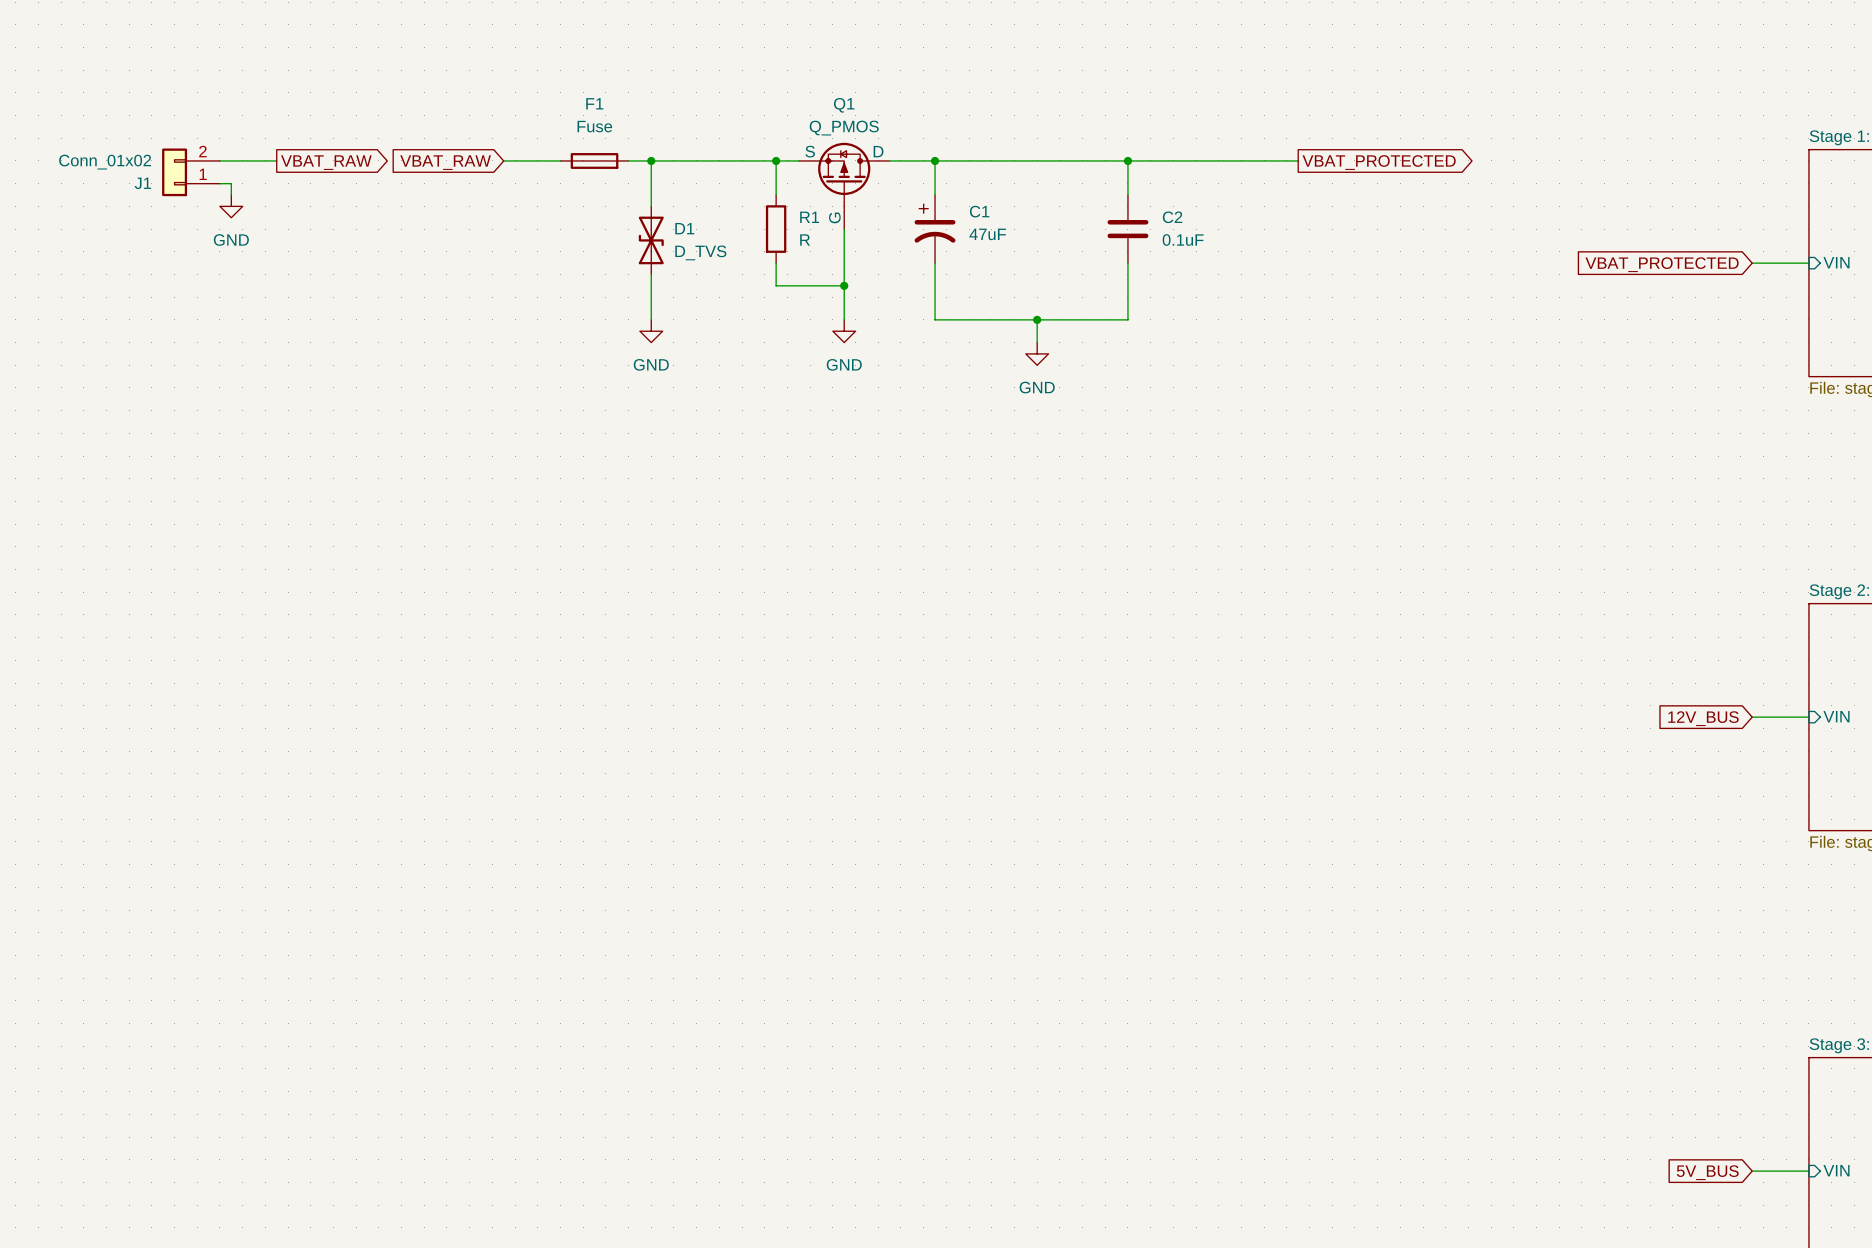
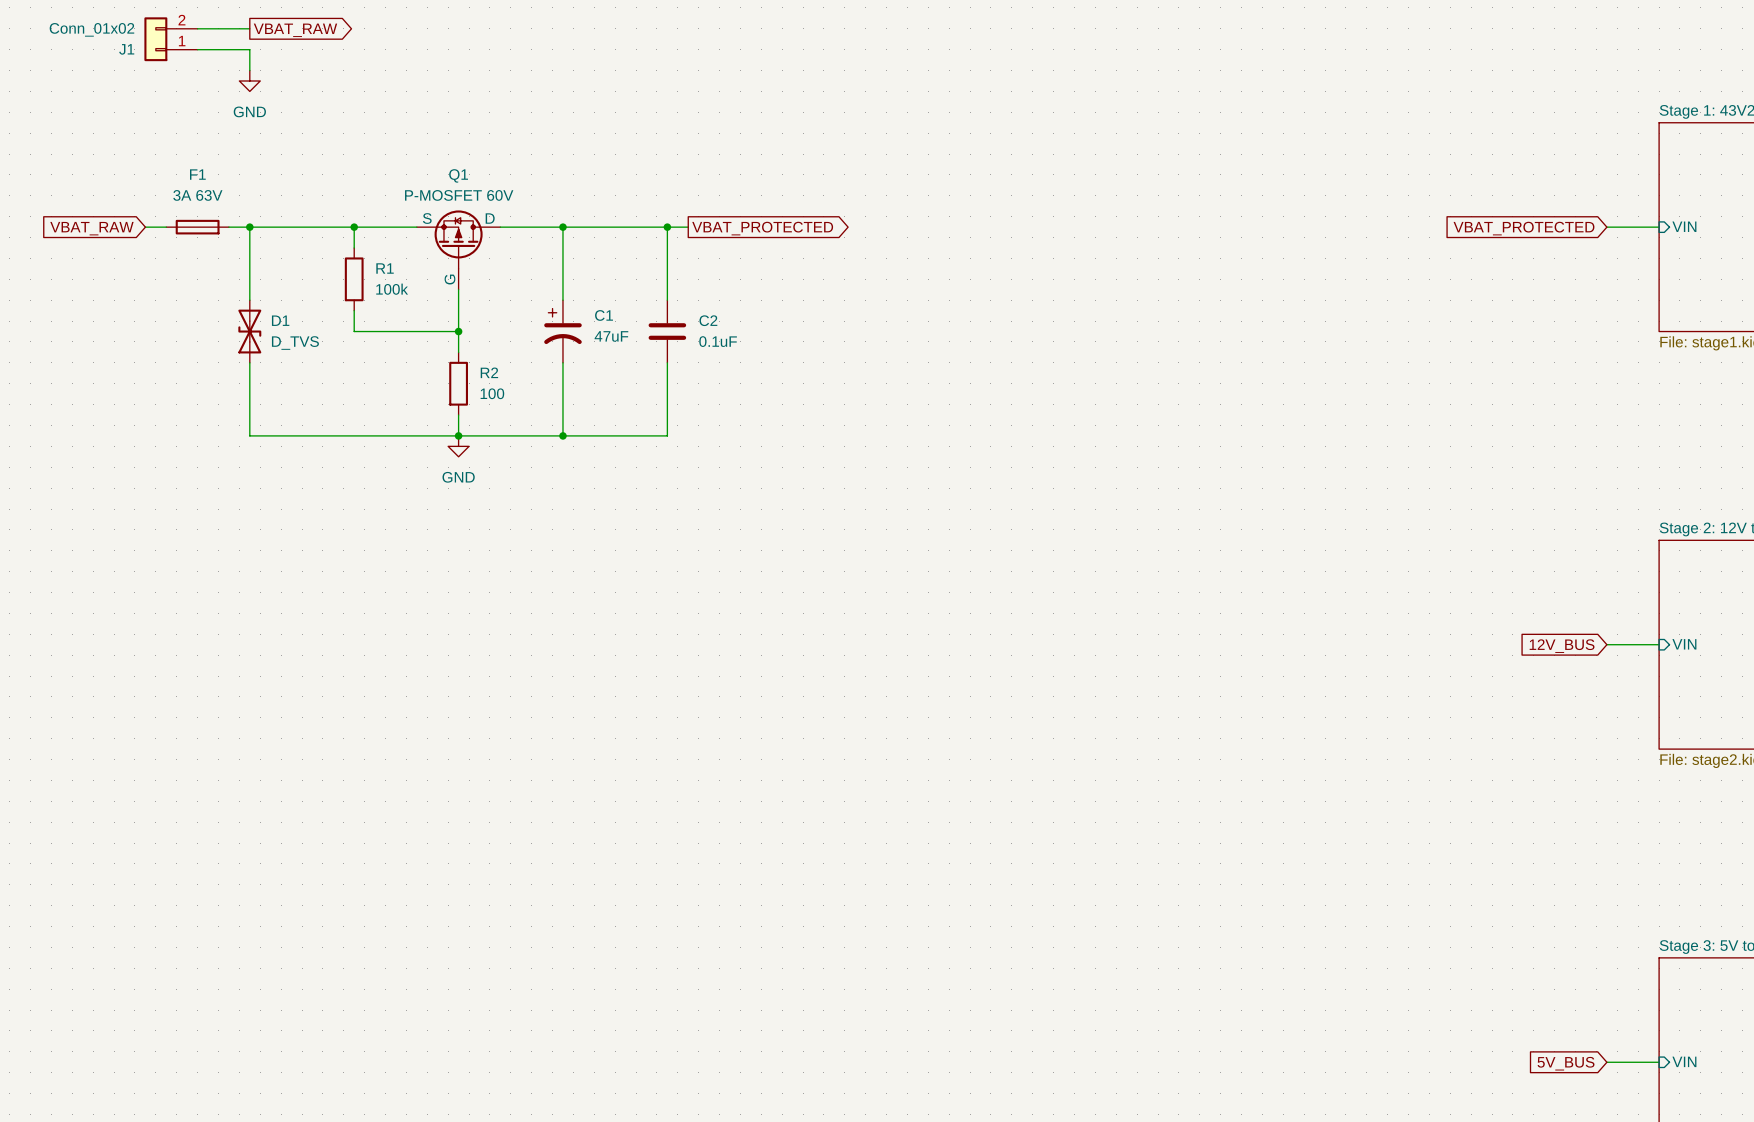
global label: none -> VBAT_RAW (295, 30)
wire: none -> (197, 49) (249, 49) (249, 70)
F1 value: Fuse (594, 126) -> 3A 63V (197, 195)
Q1 value: Q_PMOS (844, 128) -> P-MOSFET 60V (459, 195)
wire: (219, 160) (276, 160) -> (197, 28) (249, 28)
wire: (503, 160) (560, 160) -> none
F1 position: (594, 160) -> (197, 227)
wire: (628, 160) (798, 160) -> none
wire: (651, 160) (651, 206) -> none
junction: (651, 160) -> none
wire: (776, 160) (776, 195) -> none
junction: (776, 160) -> none
wire: (889, 160) (1298, 160) -> none
wire: (935, 160) (935, 195) -> none
junction: (935, 160) -> none
wire: (1127, 160) (1127, 195) -> none
junction: (1127, 160) -> none
global label: VBAT_RAW (326, 162) -> none
global label: VBAT_RAW (445, 162) -> none
global label: VBAT_PROTECTED (1379, 162) -> none
J1 position: (191, 172) -> (171, 39)
wire: (219, 183) (231, 183) (231, 195) -> none
Q1 position: (844, 185) -> (458, 250)
power symbol position: GND (231, 206) -> GND (249, 80)
R1 position: (776, 229) -> (354, 279)
wire: (844, 229) (844, 319) -> none
C1 position: (935, 229) -> (562, 331)
C2 position: (1127, 229) -> (667, 331)
D1 position: (651, 240) -> (249, 331)
R1 value: R (805, 240) -> 100k (392, 289)
wire: none -> (145, 227) (166, 227)
wire: none -> (228, 227) (416, 227)
wire: none -> (249, 227) (249, 300)
junction: none -> (249, 227)
wire: none -> (354, 227) (354, 248)
junction: none -> (354, 227)
wire: none -> (500, 227) (688, 227)
wire: none -> (562, 227) (562, 300)
junction: none -> (562, 227)
wire: none -> (667, 227) (667, 300)
junction: none -> (667, 227)
wire: (776, 263) (776, 285) (844, 285) -> none
wire: (935, 263) (935, 319) (1127, 319) (1127, 263) -> none
global label: none -> VBAT_RAW (91, 228)
global label: none -> VBAT_PROTECTED (762, 228)
wire: (651, 274) (651, 319) -> none
junction: (844, 285) -> none
wire: (1037, 319) (1037, 342) -> none
junction: (1037, 319) -> none
wire: none -> (458, 289) (458, 352)
power symbol: GND (651, 331) -> none
power symbol: GND (844, 331) -> none
wire: none -> (354, 310) (354, 331) (458, 331)
power symbol: GND (1037, 353) -> none
junction: none -> (458, 331)
wire: none -> (249, 362) (249, 435) (667, 435) (667, 362)
wire: none -> (562, 362) (562, 435)
R2: none -> 100 (458, 383)
wire: none -> (458, 415) (458, 435)
junction: none -> (458, 435)
junction: none -> (562, 435)
power symbol: none -> GND (458, 446)

